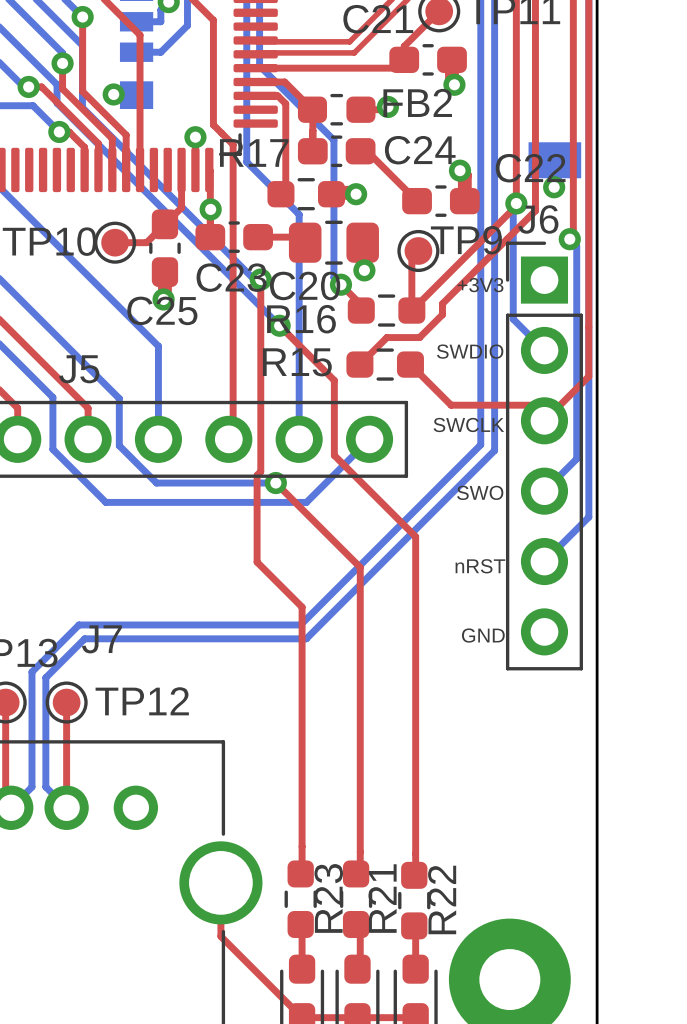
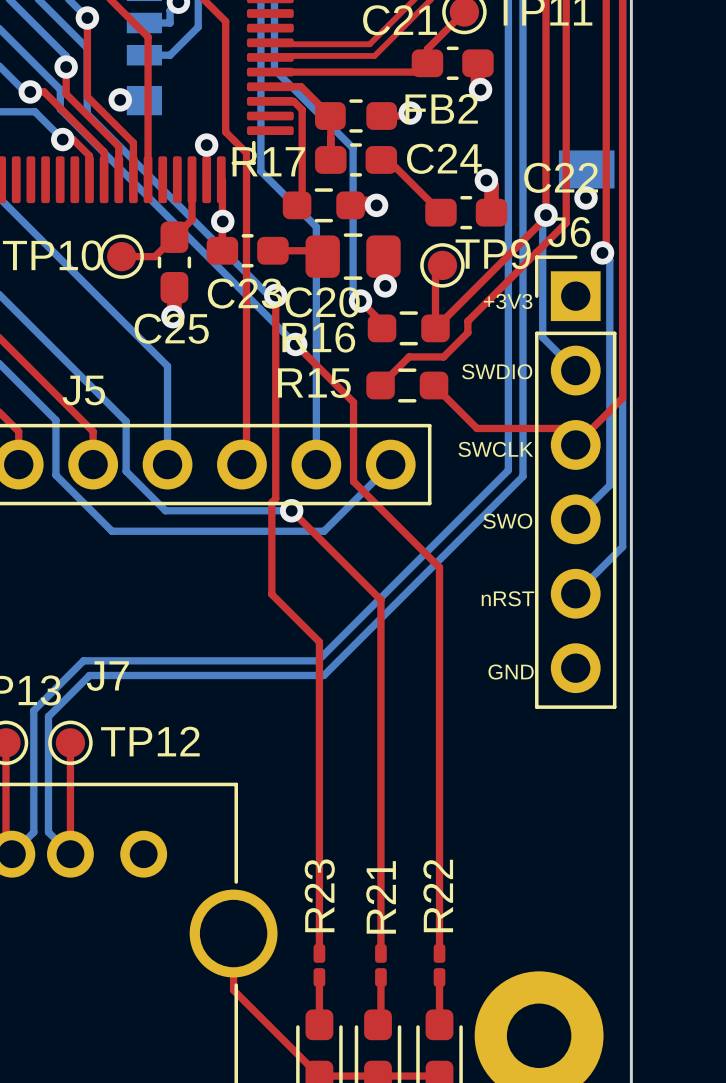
R23 footprint: [284, 860, 317, 939] -> [313, 944, 326, 987]
R21 footprint: [339, 860, 373, 939] -> [375, 944, 387, 987]
R22 footprint: [398, 861, 431, 940] -> [433, 944, 446, 987]
top track: none -> (319, 927) (319, 953)
top track: none -> (380, 929) (380, 953)
top track: none -> (439, 929) (439, 953)
R23 name position: R23 (328, 898) -> R23 (319, 895)
R21 name position: R21 (382, 898) -> R21 (381, 897)
R22 name position: R22 (442, 899) -> R22 (438, 895)

